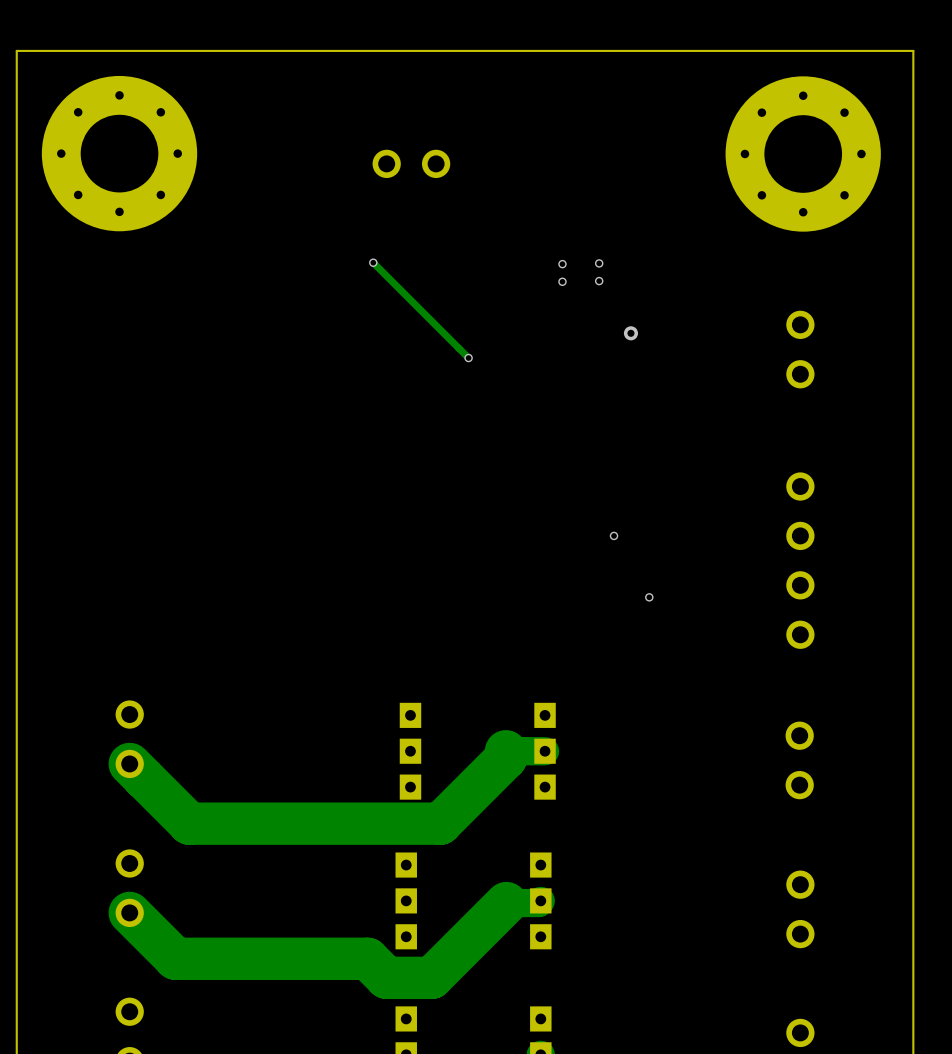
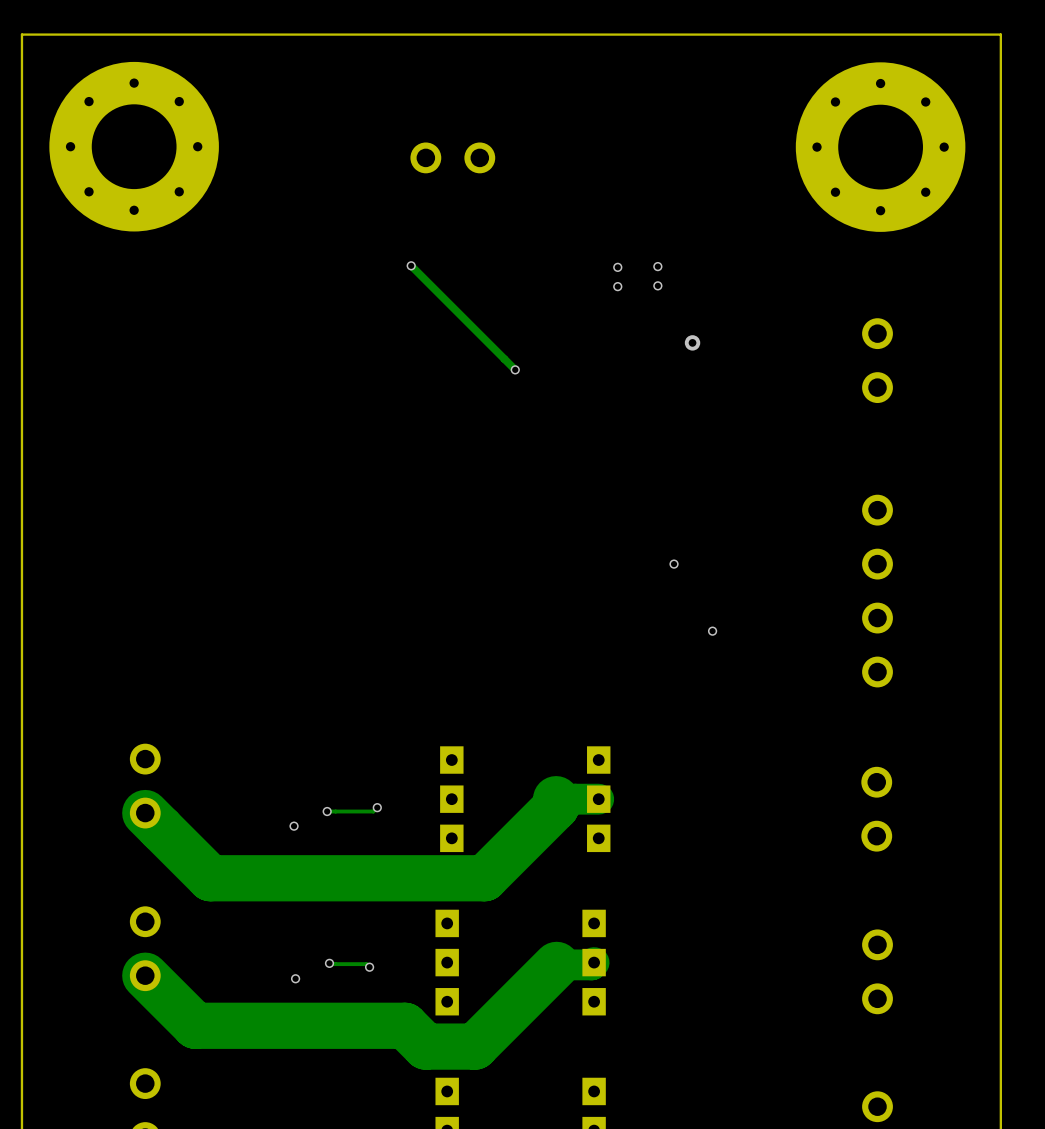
track: none -> (377, 807) (373, 811) (327, 811)
via: none -> (377, 807)
via: none -> (327, 811)
via: none -> (294, 826)
track: none -> (329, 963) (366, 964) (369, 967)
via: none -> (329, 963)
via: none -> (369, 967)
via: none -> (295, 978)

